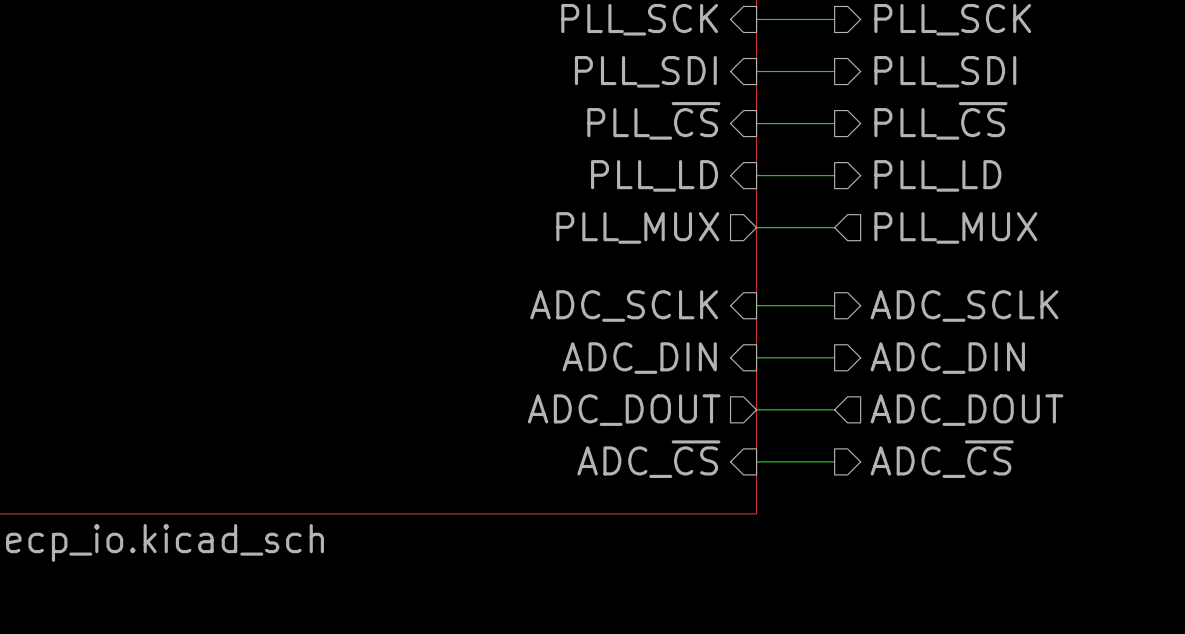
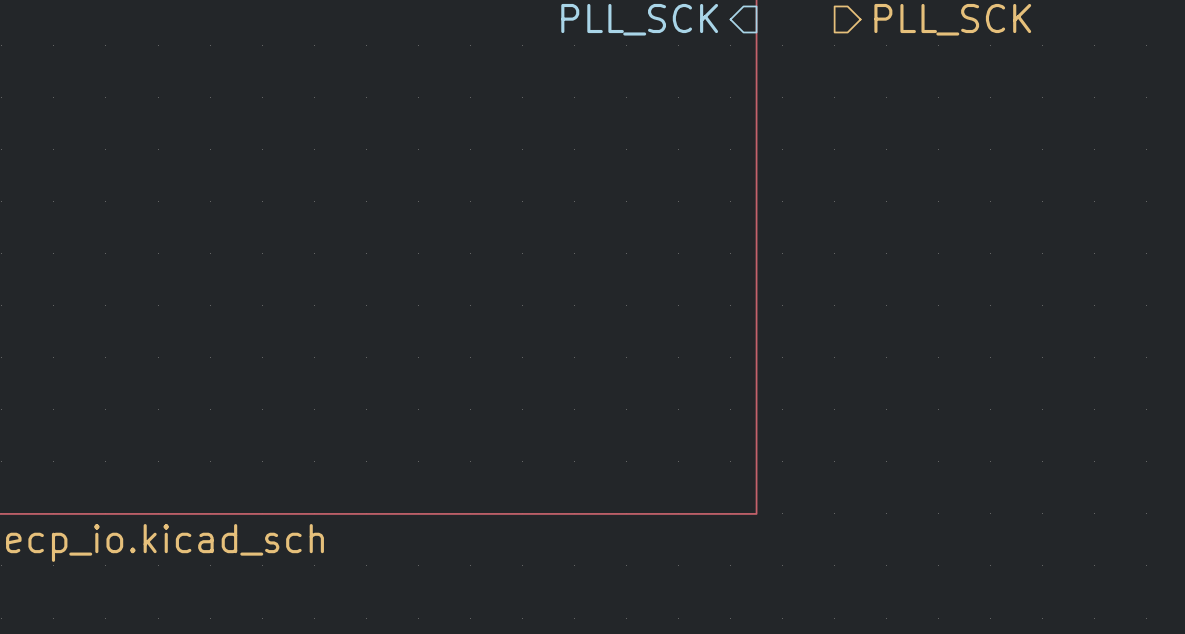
wire: (756, 19) (834, 19) -> none
sheet pin: PLL_SDI (645, 71) -> none
wire: (756, 71) (834, 71) -> none
hierarchical label: PLL_SDI (945, 71) -> none
sheet pin: PLL_~{CS} (653, 120) -> none
hierarchical label: PLL_~{CS} (940, 120) -> none
wire: (756, 123) (834, 123) -> none
sheet pin: PLL_LD (654, 175) -> none
wire: (756, 175) (834, 175) -> none
hierarchical label: PLL_LD (937, 175) -> none
sheet pin: PLL_MUX (637, 227) -> none
wire: (756, 227) (834, 227) -> none
hierarchical label: PLL_MUX (955, 227) -> none
wire: (756, 305) (834, 305) -> none
sheet pin: ADC_SCLK (624, 306) -> none
hierarchical label: ADC_SCLK (964, 306) -> none
wire: (756, 357) (834, 357) -> none
sheet pin: ADC_DIN (639, 358) -> none
hierarchical label: ADC_DIN (947, 358) -> none
wire: (756, 409) (834, 409) -> none
sheet pin: ADC_DOUT (624, 410) -> none
hierarchical label: ADC_DOUT (967, 410) -> none
sheet pin: ADC_~{CS} (648, 459) -> none
hierarchical label: ADC_~{CS} (942, 459) -> none
wire: (756, 461) (834, 461) -> none

